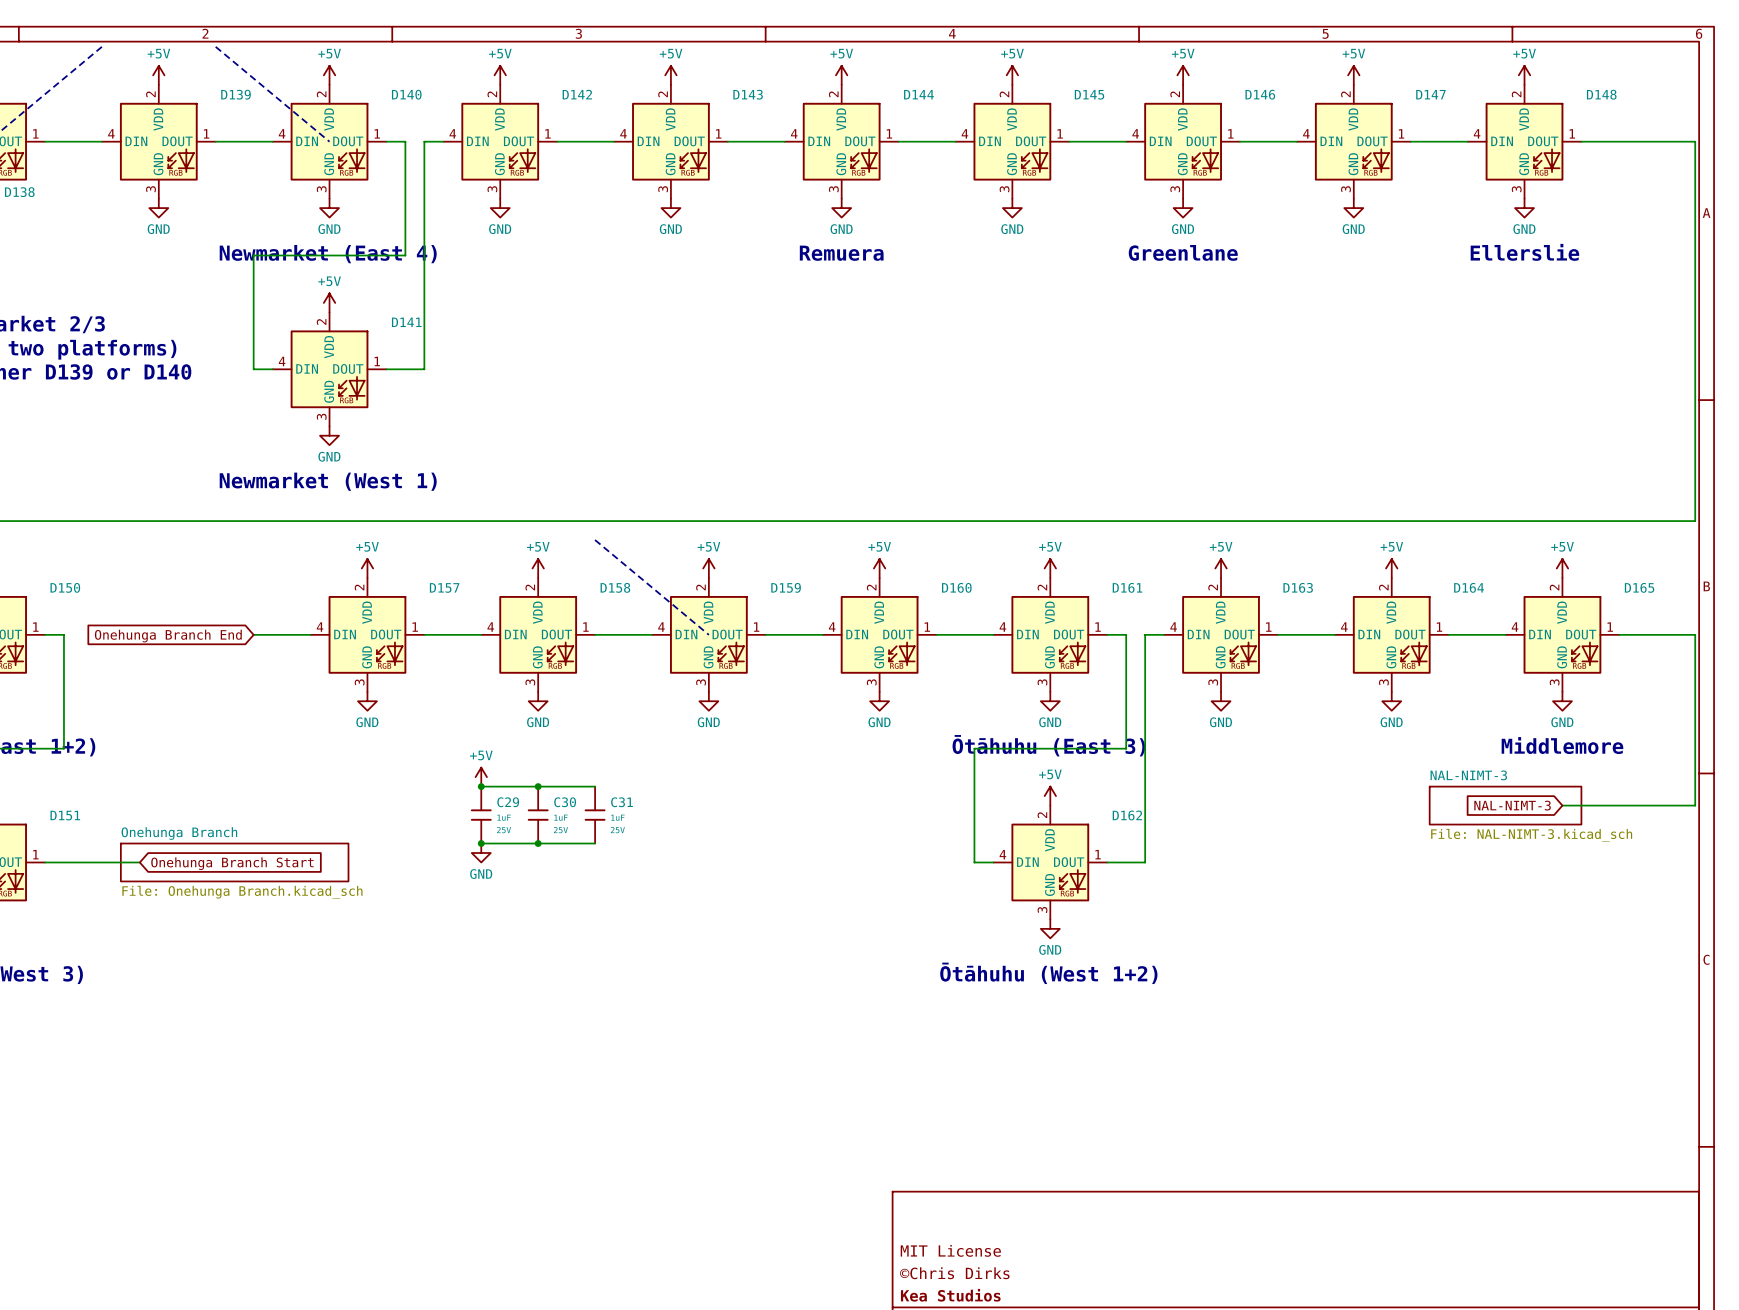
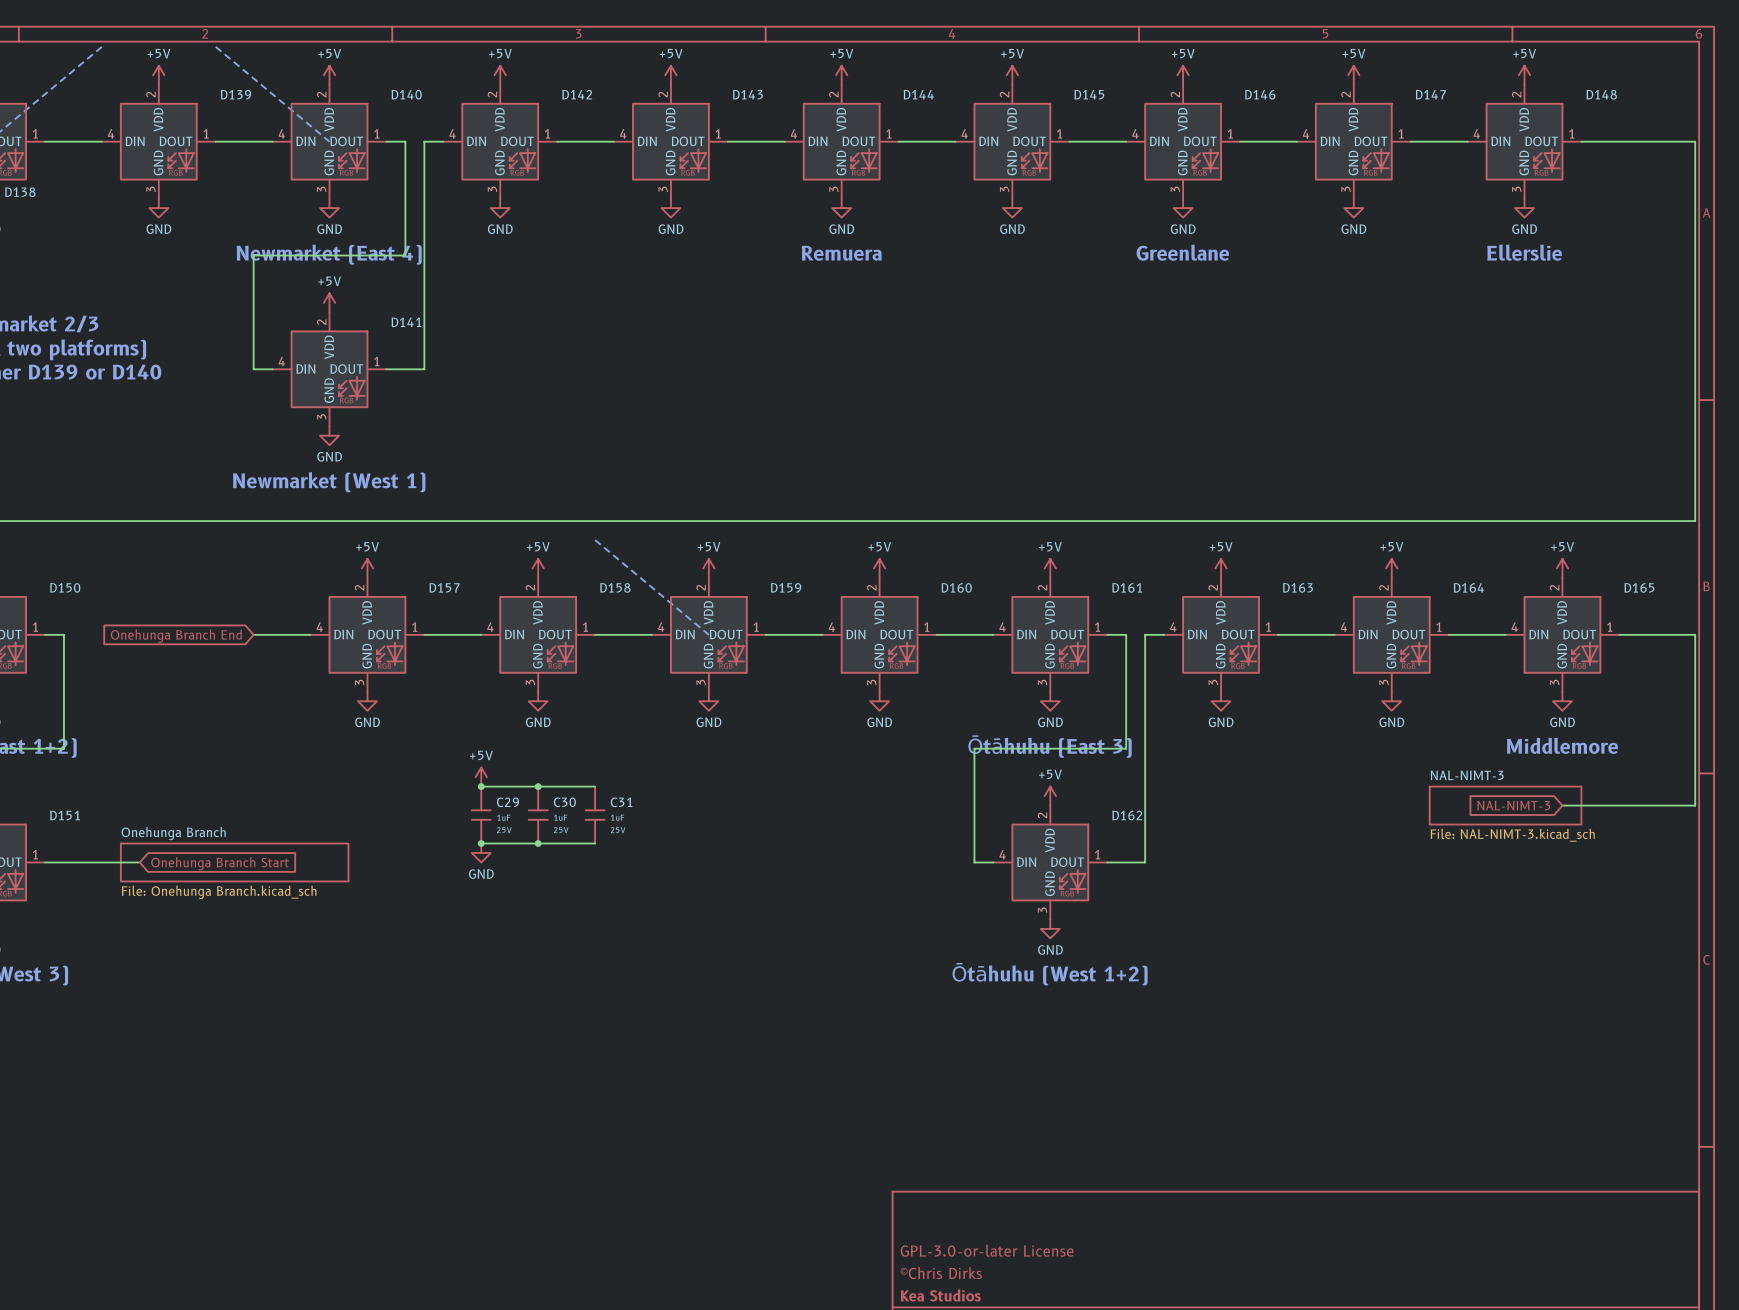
title block: MIT License (950, 1250) -> GPL-3.0-or-later License (987, 1250)

